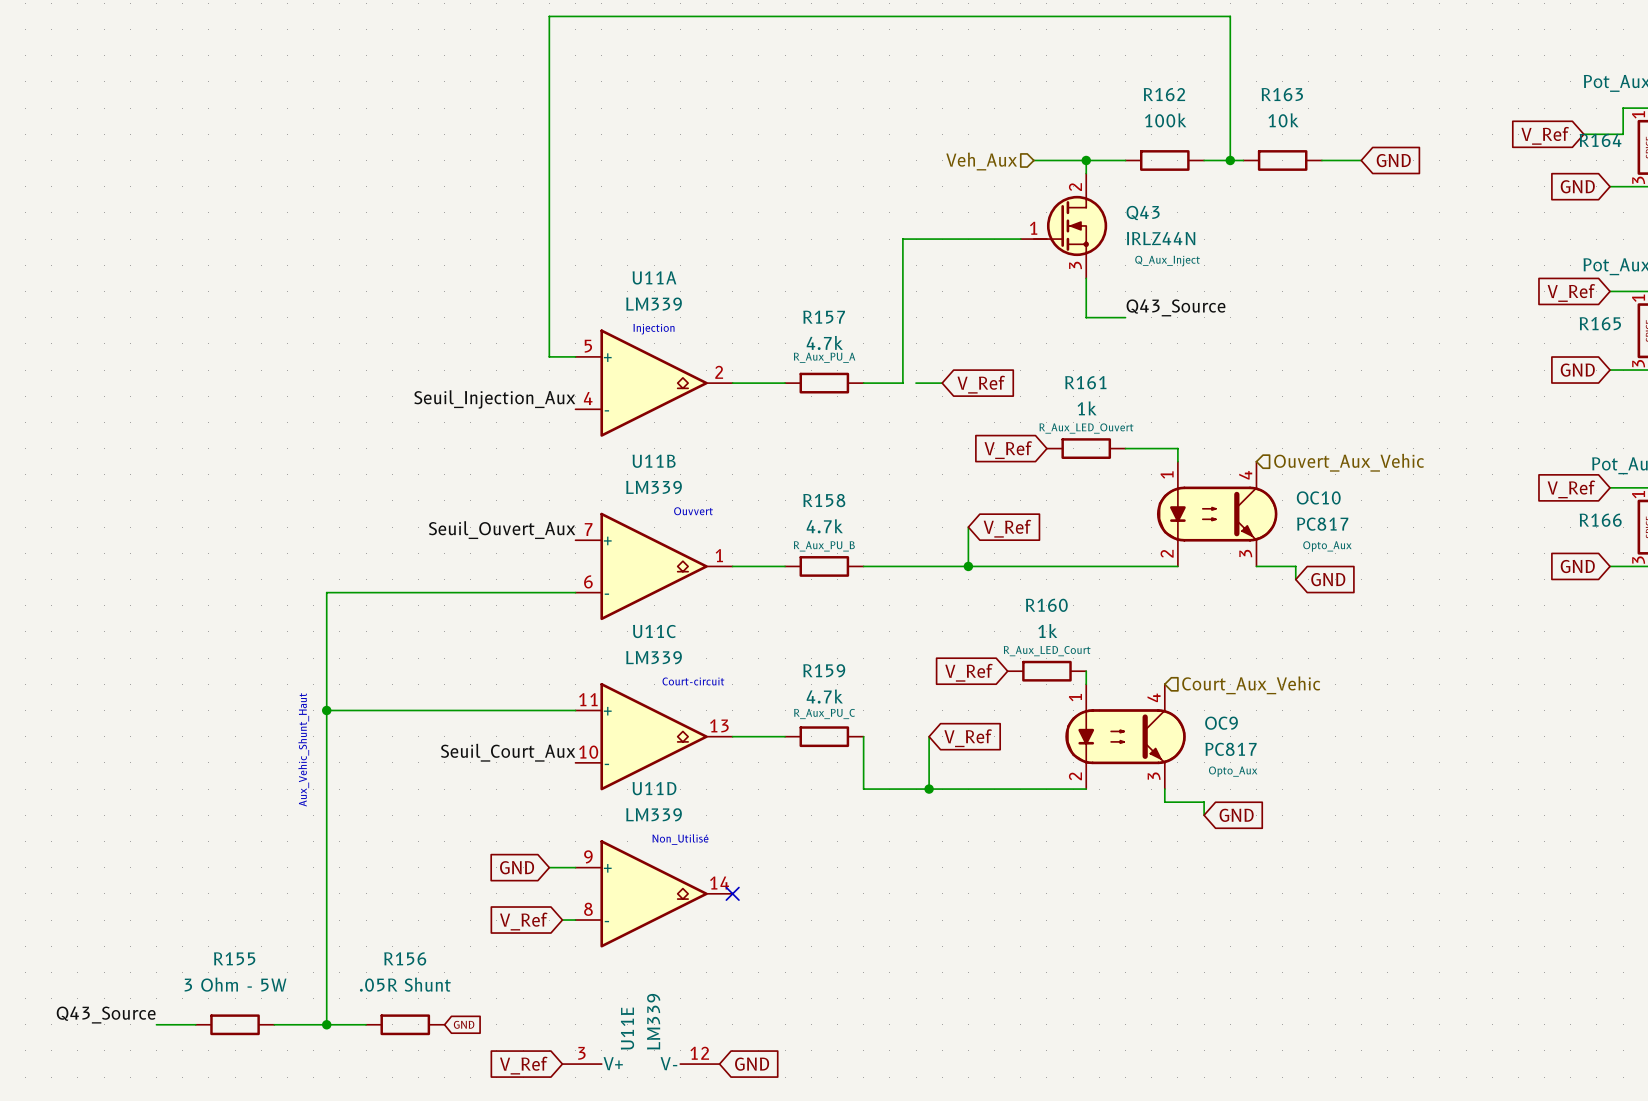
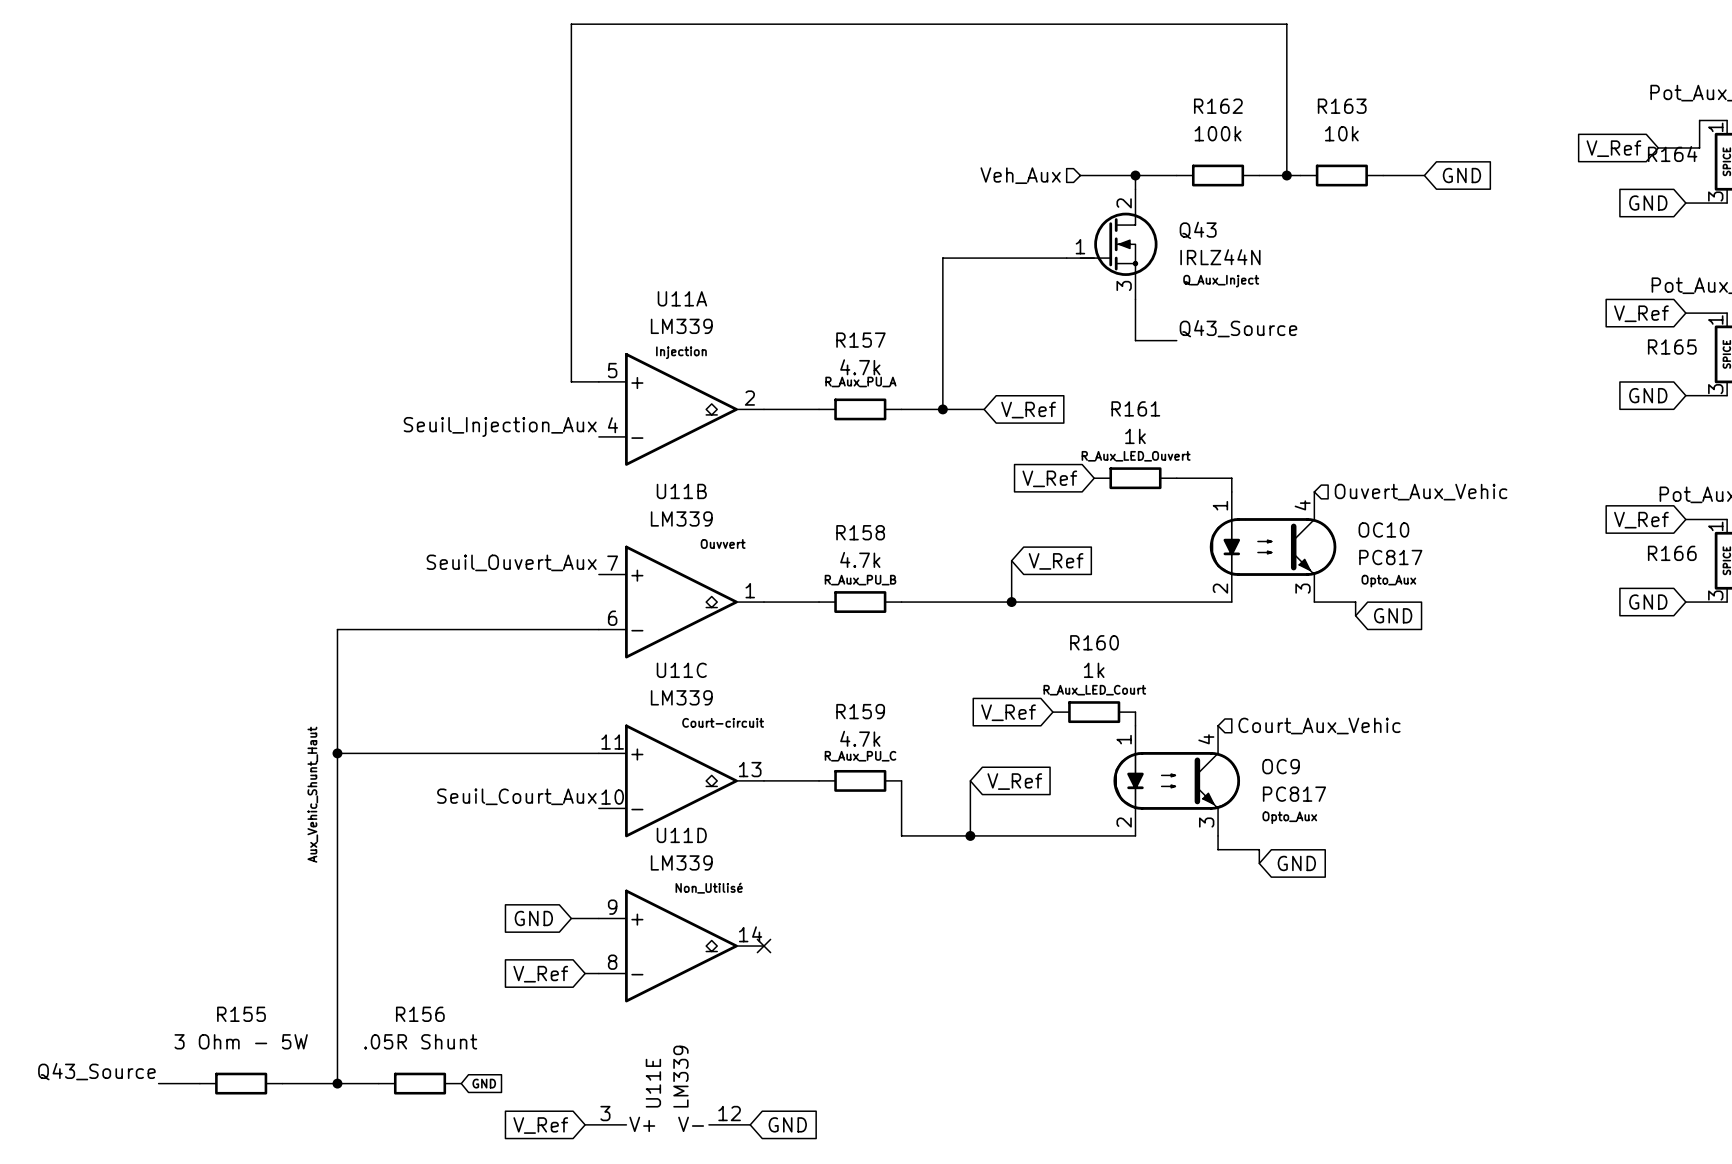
wire: none -> (942, 409) (956, 409)
junction: none -> (942, 409)

